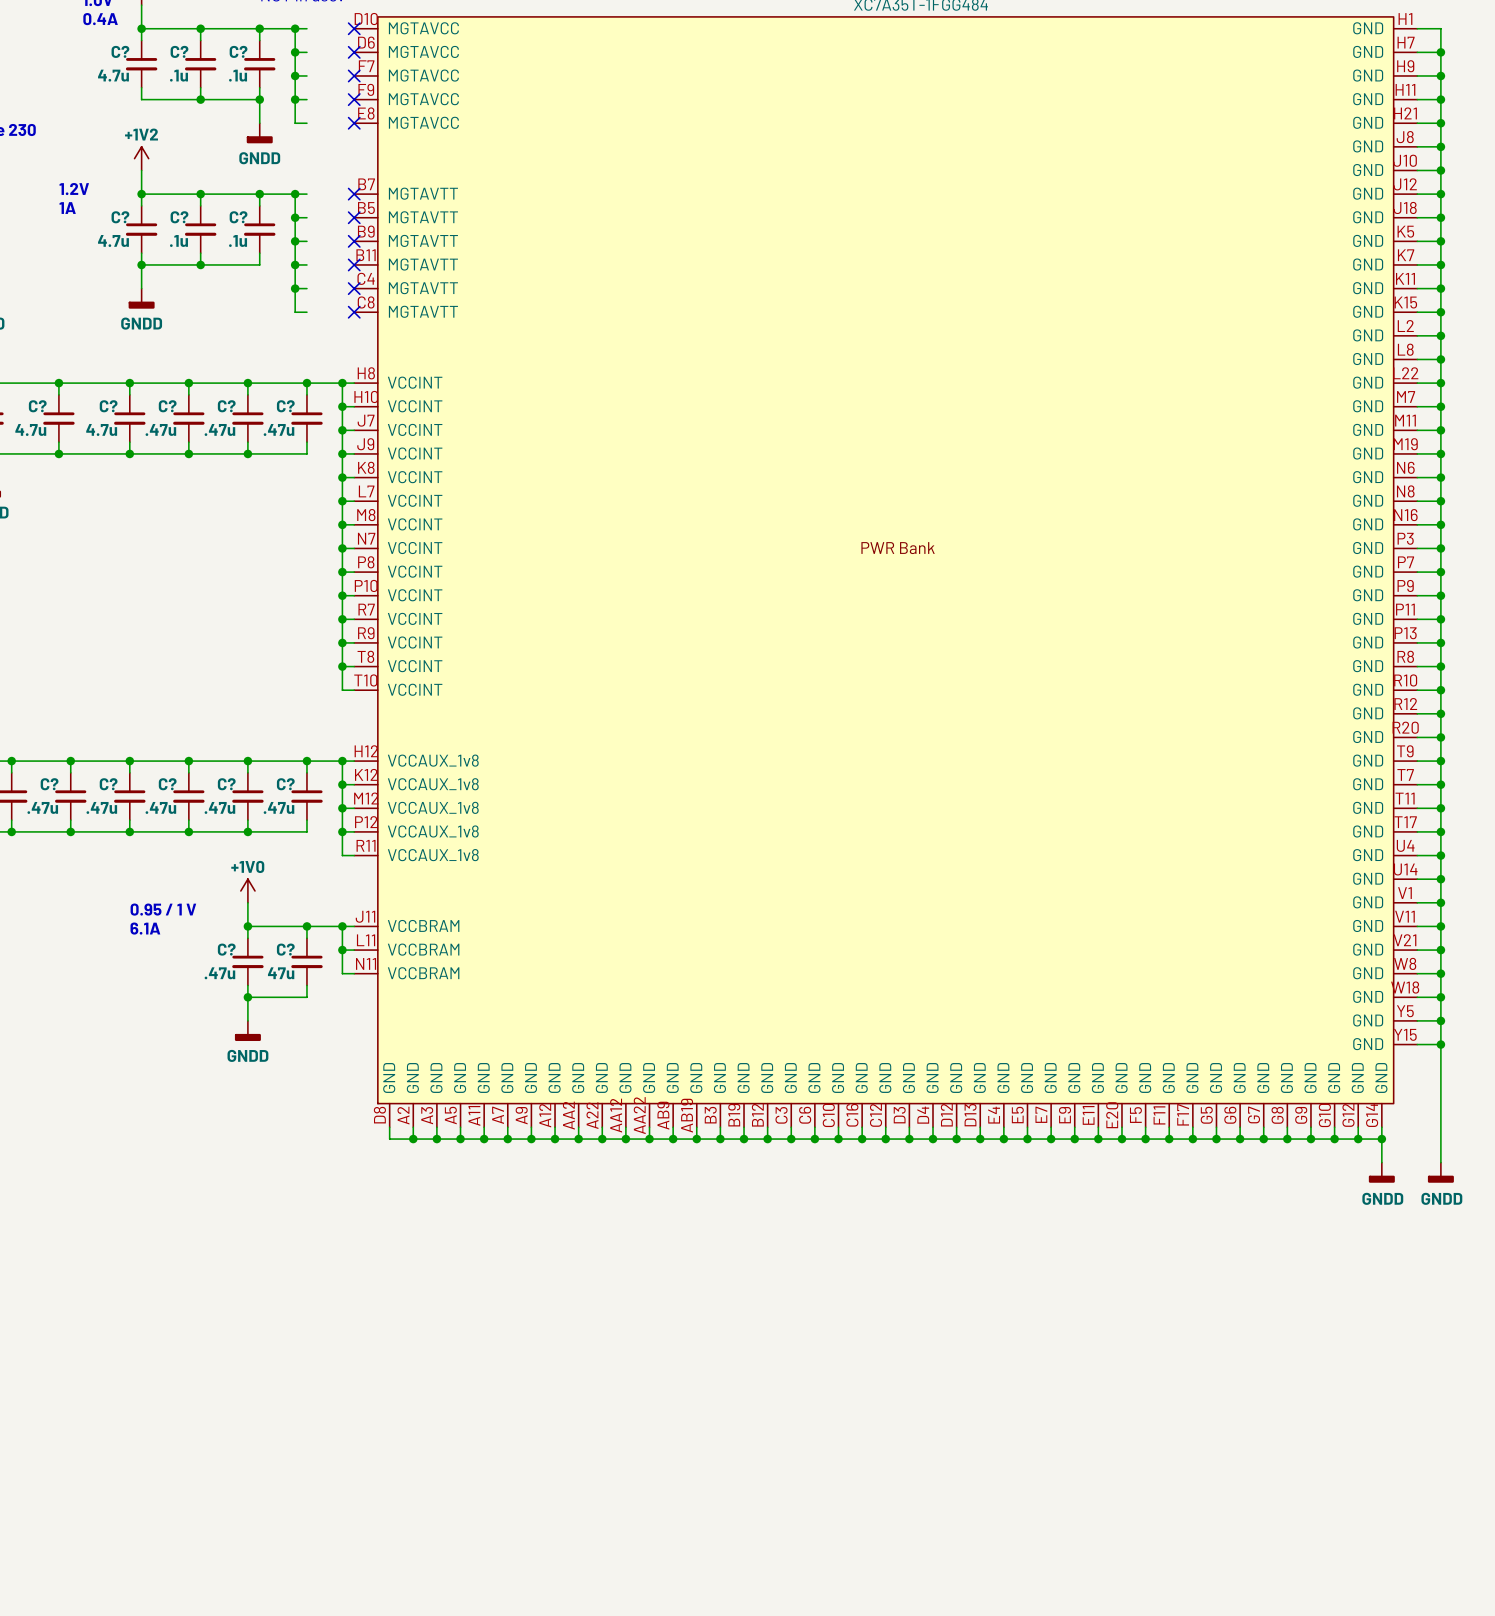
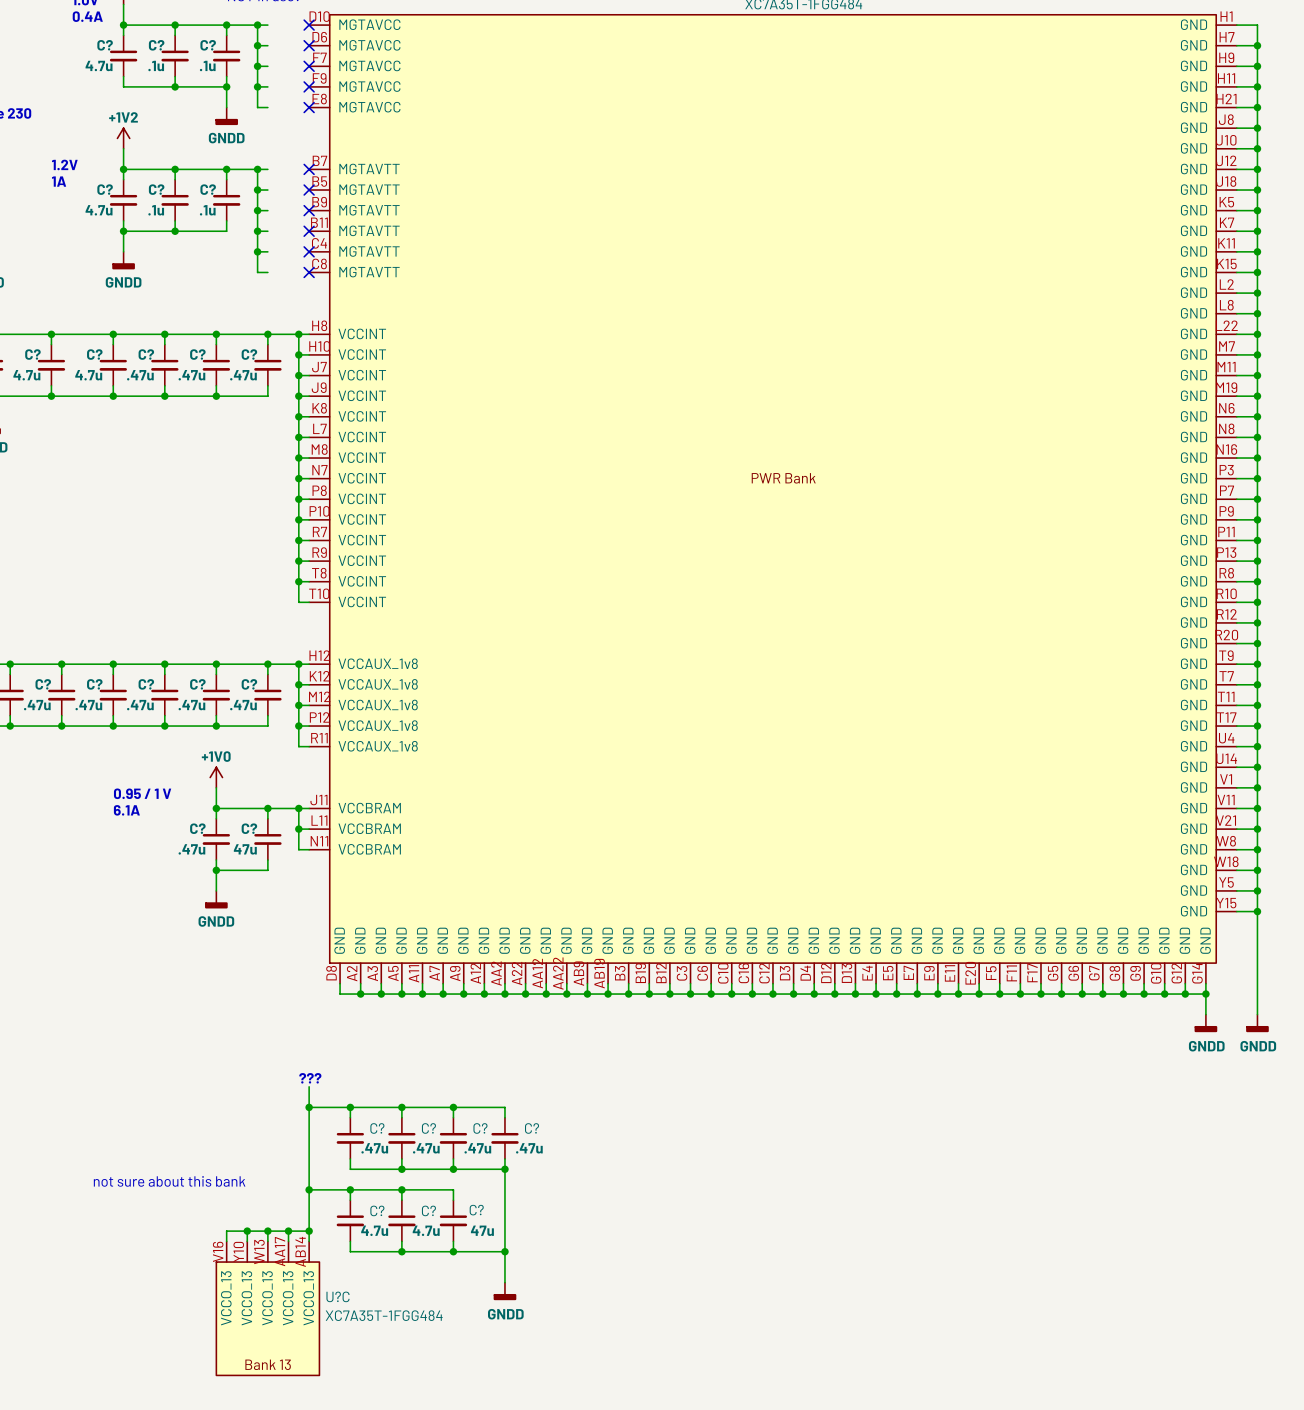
text: none -> ??? (310, 1078)
wire: none -> (309, 1086) (309, 1241)
wire: none -> (309, 1107) (504, 1107) (504, 1117)
junction: none -> (309, 1107)
wire: none -> (350, 1107) (350, 1117)
junction: none -> (350, 1107)
wire: none -> (401, 1107) (401, 1117)
junction: none -> (401, 1107)
wire: none -> (453, 1107) (453, 1117)
junction: none -> (453, 1107)
C?: none -> .47u (350, 1138)
C?: none -> .47u (401, 1138)
C?: none -> .47u (453, 1138)
C?: none -> .47u (504, 1138)
wire: none -> (350, 1158) (350, 1169) (504, 1169)
wire: none -> (401, 1158) (401, 1169)
wire: none -> (453, 1158) (453, 1169)
wire: none -> (504, 1158) (504, 1282)
junction: none -> (401, 1169)
junction: none -> (453, 1169)
junction: none -> (504, 1169)
text: none -> not sure about this bank (169, 1181)
wire: none -> (309, 1189) (453, 1189) (453, 1200)
junction: none -> (309, 1189)
wire: none -> (350, 1189) (350, 1200)
junction: none -> (350, 1189)
wire: none -> (401, 1189) (401, 1200)
junction: none -> (401, 1189)
C?: none -> 4.7u (350, 1220)
C?: none -> 4.7u (401, 1220)
C?: none -> 47u (453, 1220)
wire: none -> (247, 1231) (247, 1241)
junction: none -> (247, 1231)
wire: none -> (267, 1231) (267, 1241)
junction: none -> (267, 1231)
wire: none -> (288, 1231) (288, 1241)
junction: none -> (288, 1231)
wire: none -> (309, 1231) (226, 1231) (226, 1241)
junction: none -> (309, 1231)
wire: none -> (350, 1241) (350, 1251) (504, 1251)
wire: none -> (401, 1241) (401, 1251)
wire: none -> (453, 1241) (453, 1251)
junction: none -> (401, 1251)
junction: none -> (453, 1251)
junction: none -> (504, 1251)
power symbol: none -> GNDD (504, 1291)
U?C: none -> XC7A35T-1FGG484 (267, 1308)

